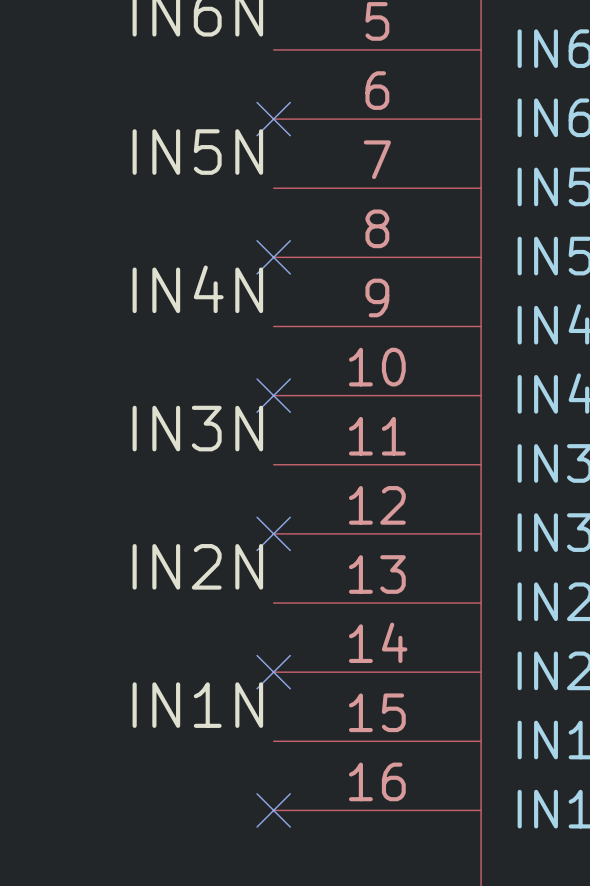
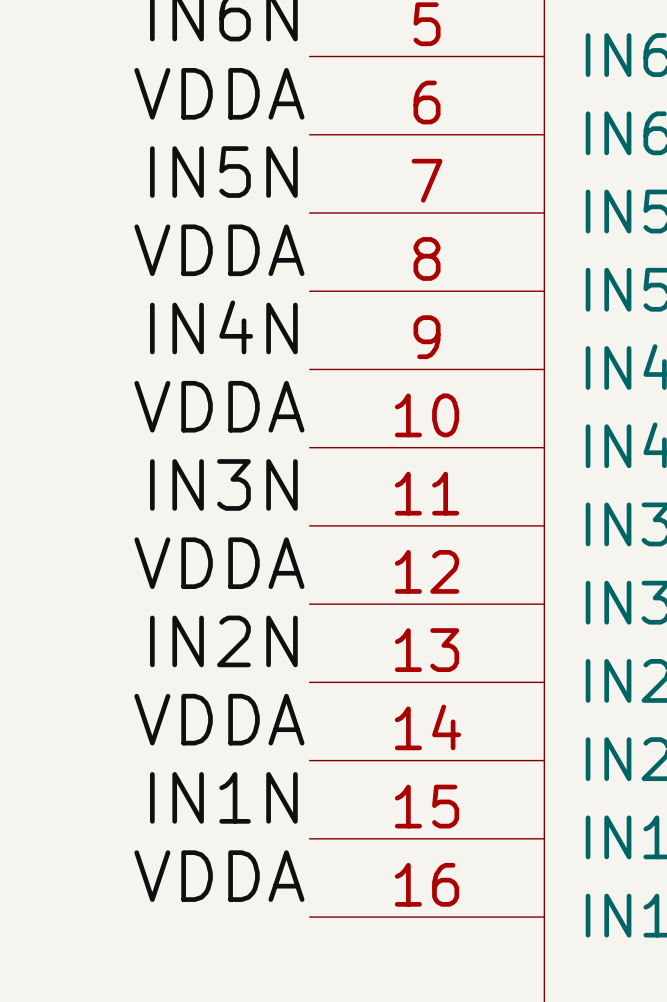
label: none -> VDDA (219, 93)
no-connect mark: (273, 119) -> none
label: none -> VDDA (219, 250)
no-connect mark: (273, 257) -> none
label: none -> VDDA (219, 406)
no-connect mark: (273, 395) -> none
label: none -> VDDA (219, 563)
no-connect mark: (273, 533) -> none
label: none -> VDDA (219, 719)
no-connect mark: (273, 672) -> none
label: none -> VDDA (219, 876)
no-connect mark: (273, 810) -> none

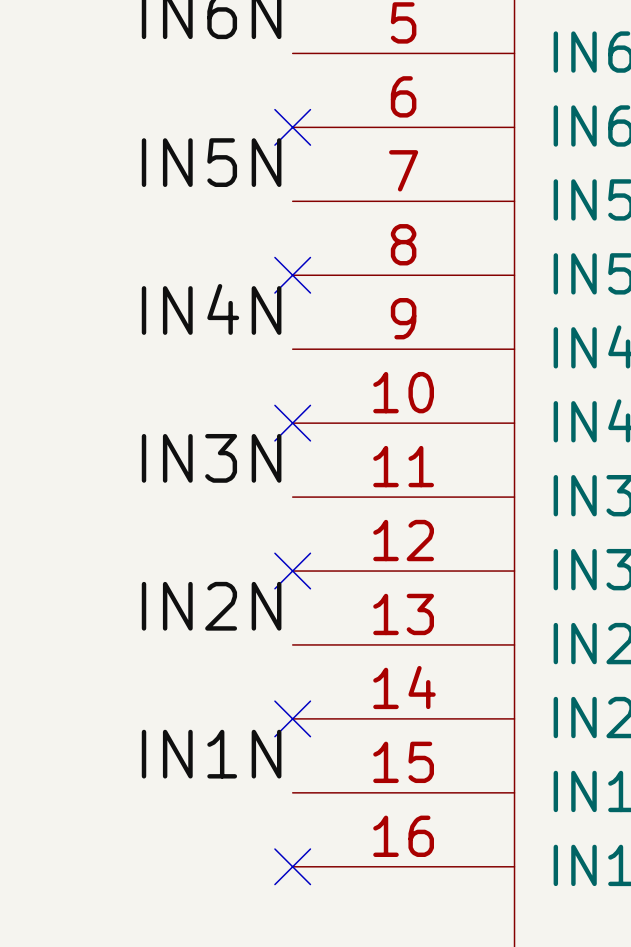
label: VDDA (219, 93) -> none
no-connect mark: none -> (292, 127)
label: VDDA (219, 250) -> none
no-connect mark: none -> (292, 275)
label: VDDA (219, 406) -> none
no-connect mark: none -> (292, 423)
label: VDDA (219, 563) -> none
no-connect mark: none -> (292, 571)
label: VDDA (219, 719) -> none
no-connect mark: none -> (292, 718)
label: VDDA (219, 876) -> none
no-connect mark: none -> (292, 866)

